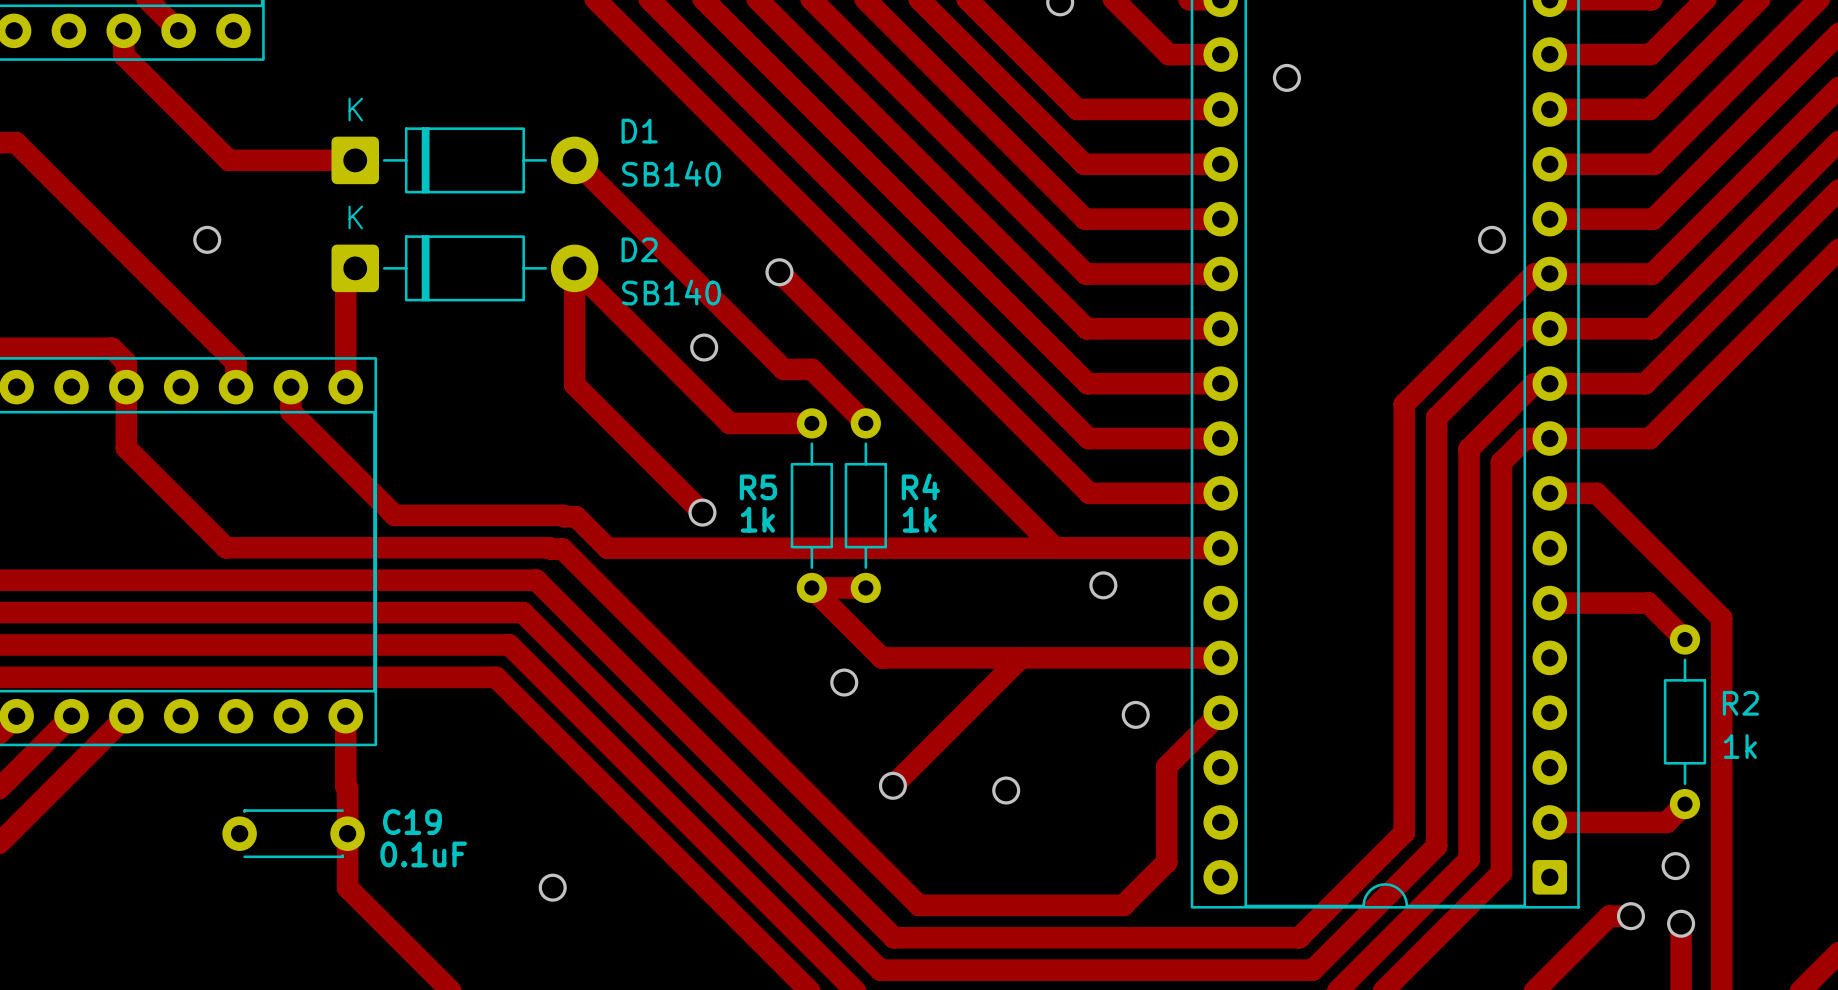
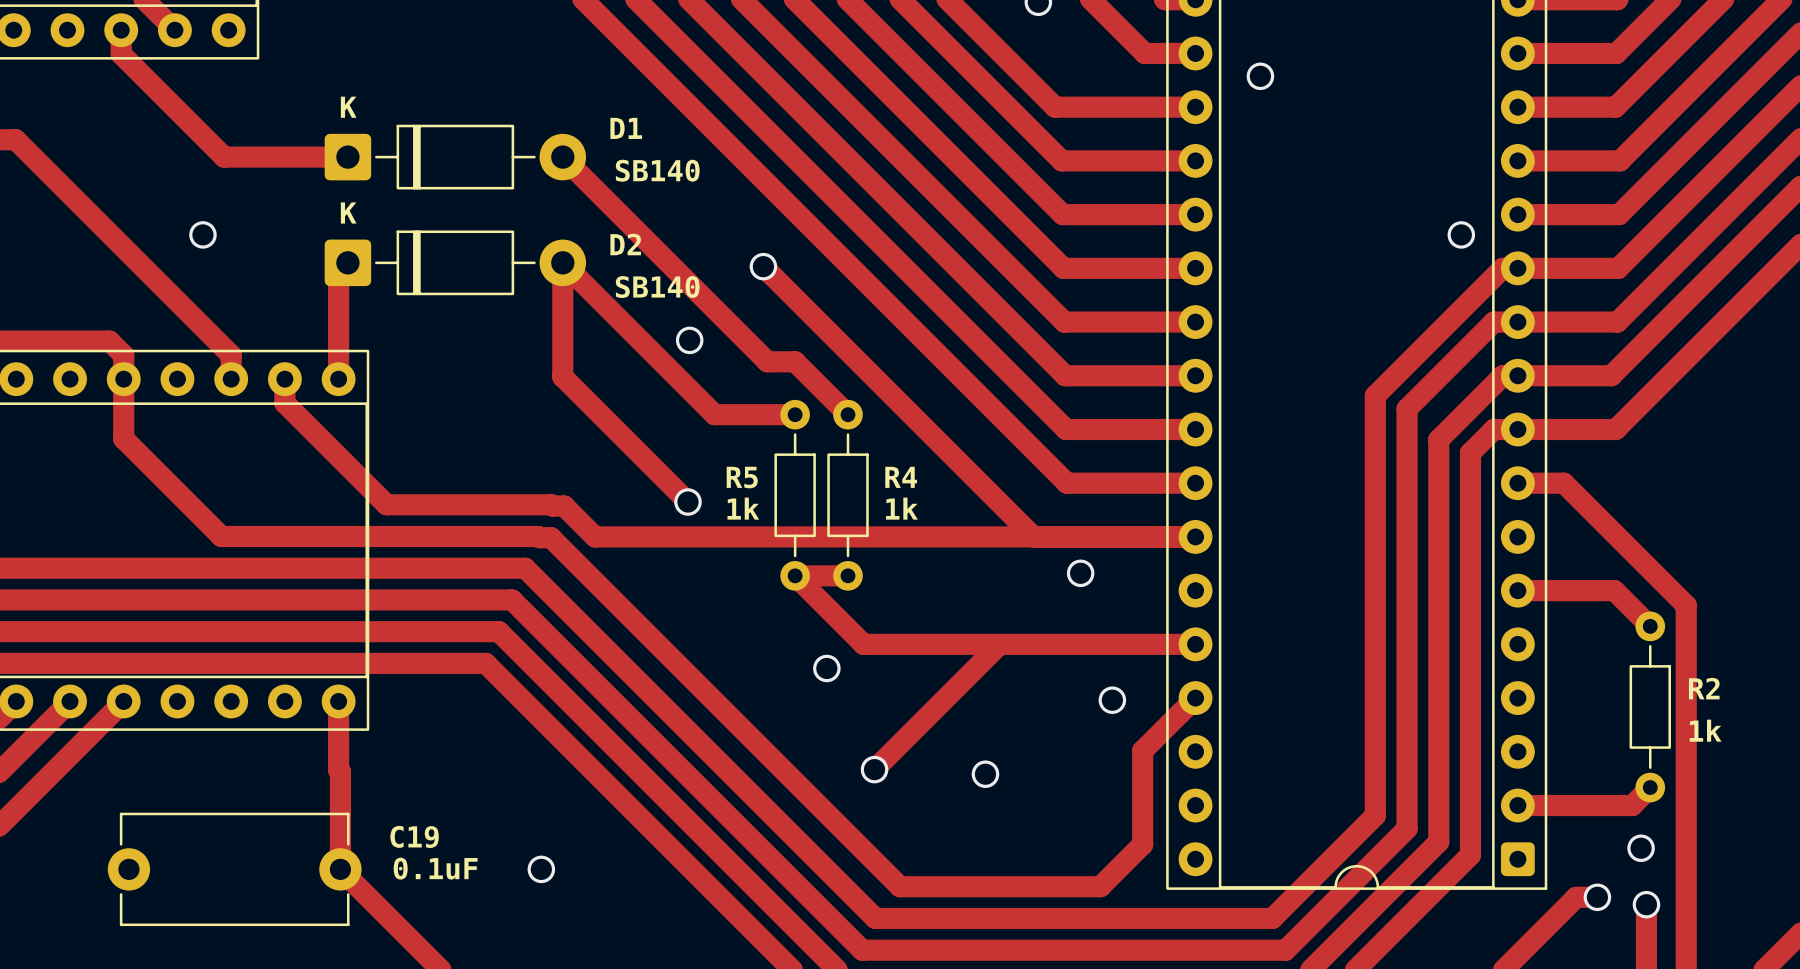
C19 footprint: [222, 809, 365, 859] -> [107, 812, 362, 927]
C19 name position: C19 (412, 822) -> C19 (414, 836)
C19 value position: 0.1uF (423, 854) -> 0.1uF (435, 868)

